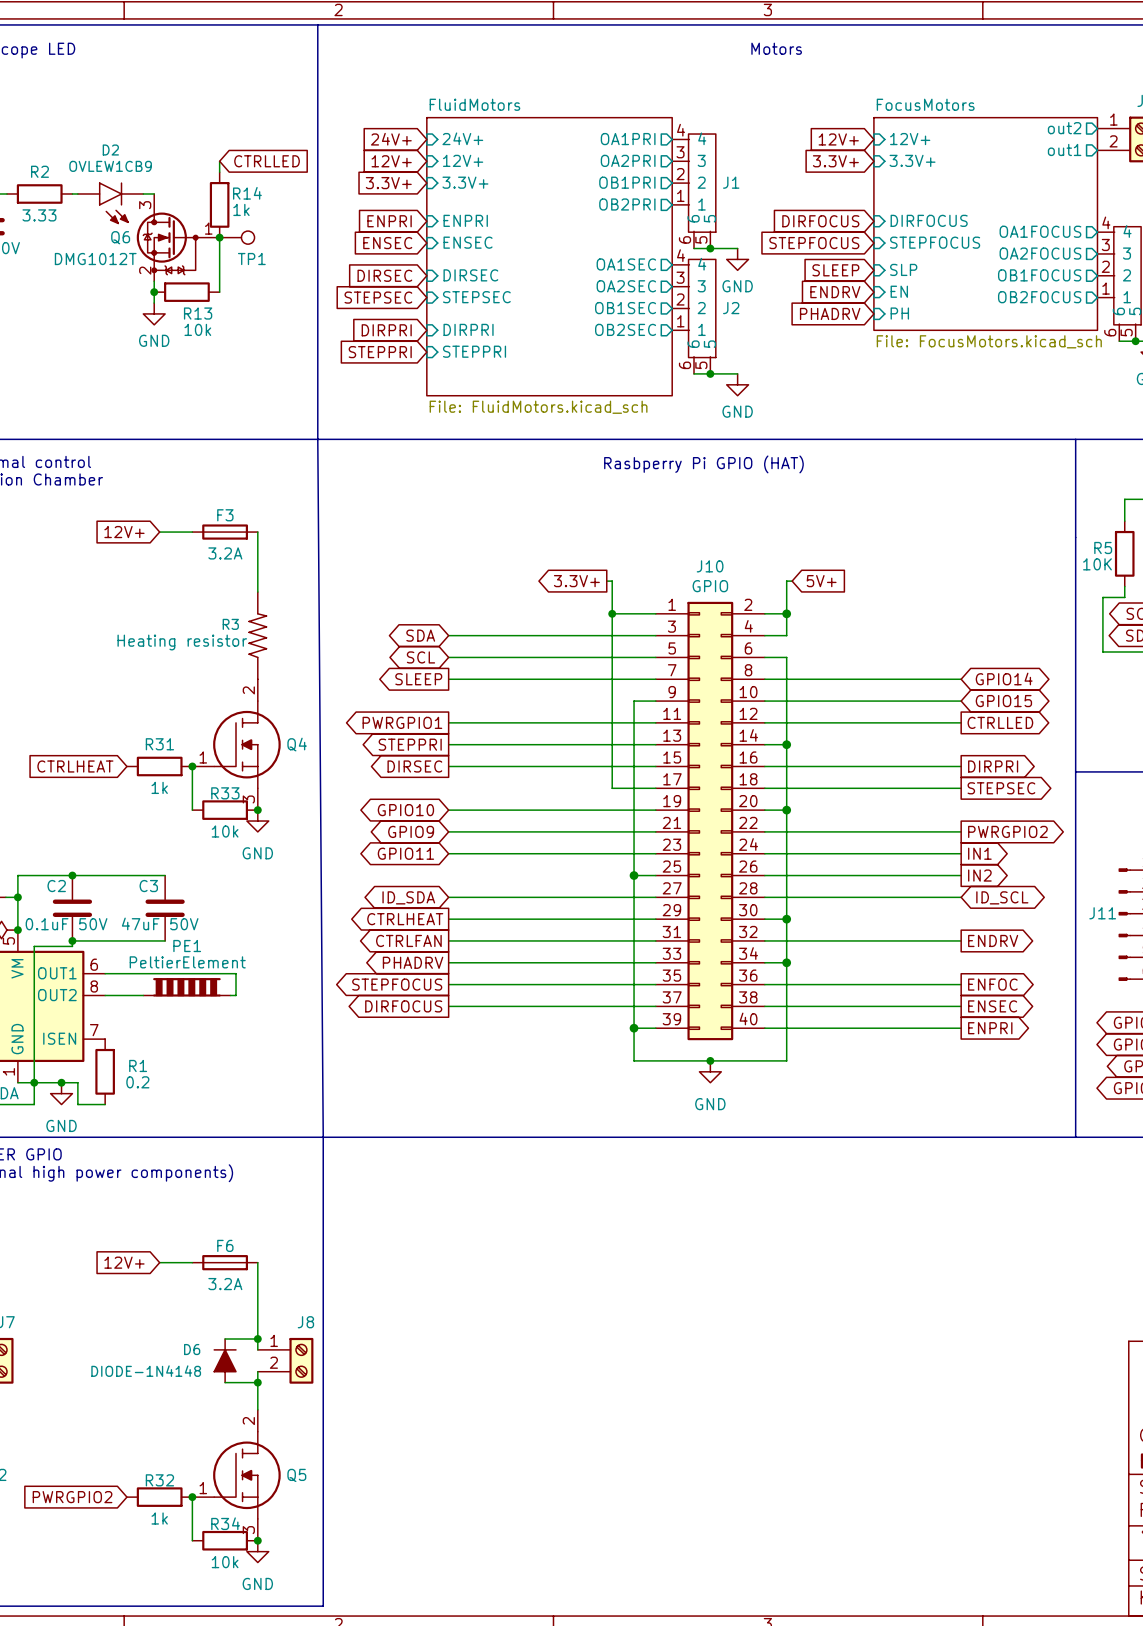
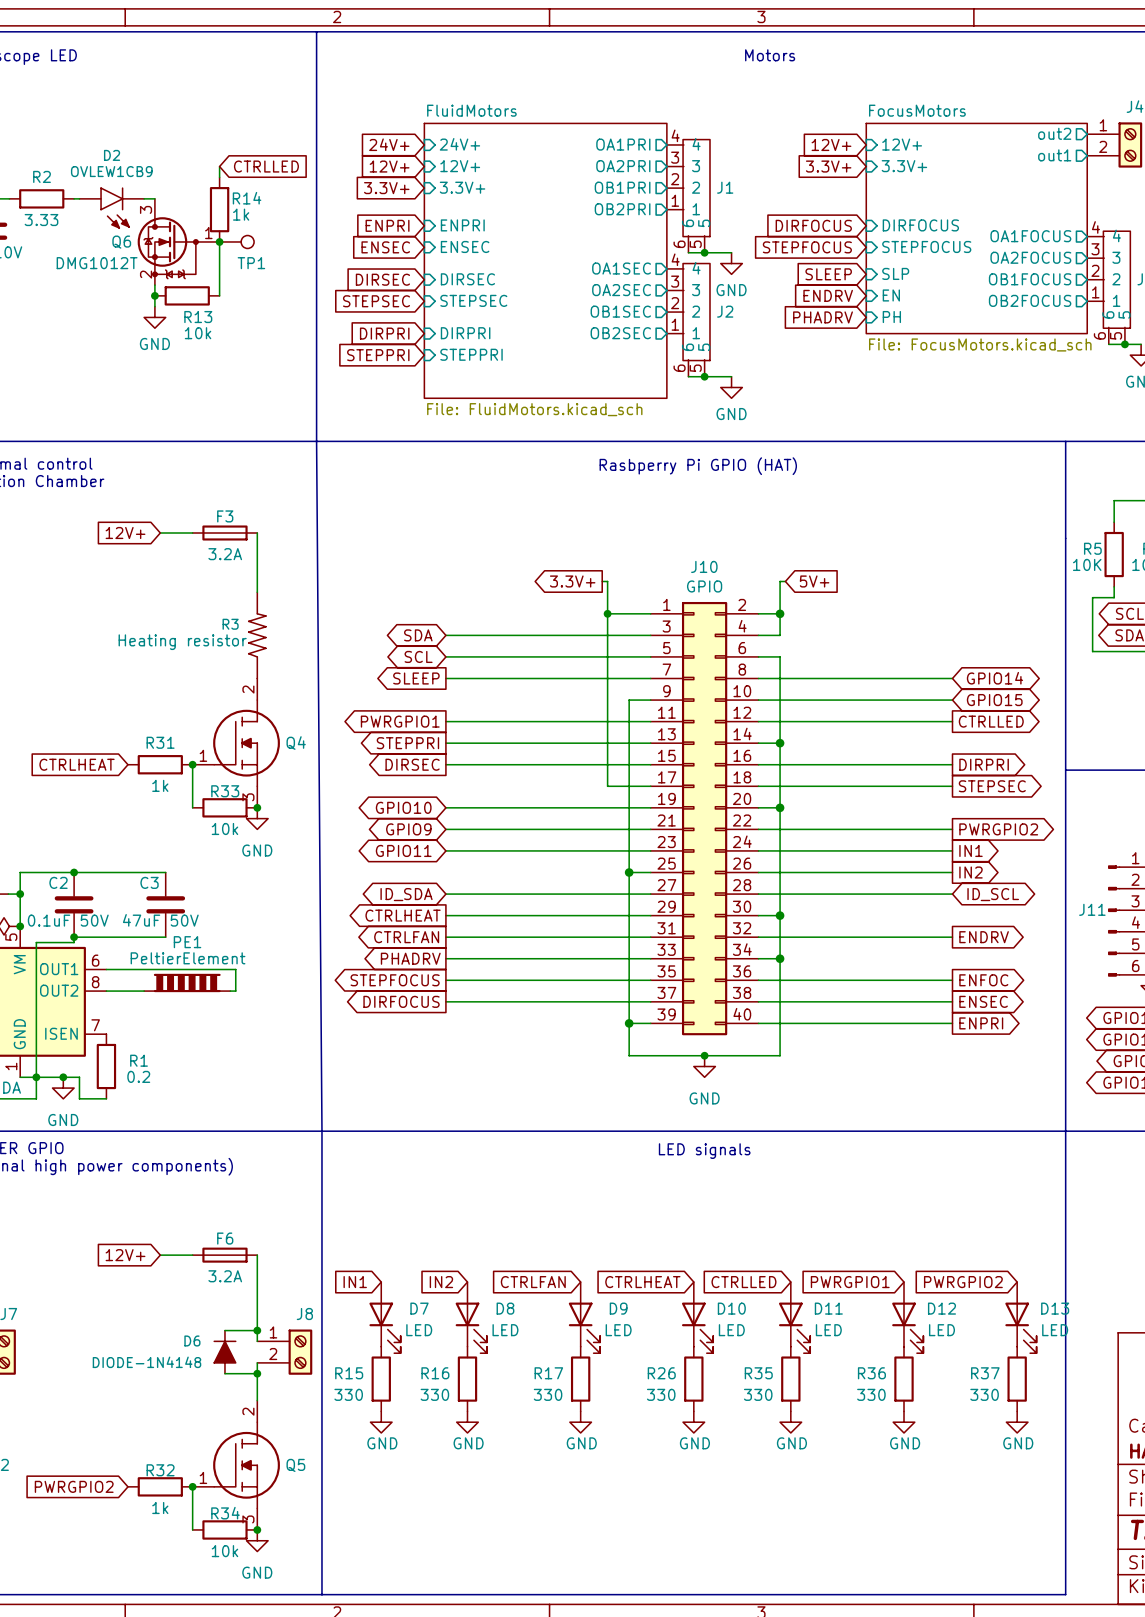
line: none -> (1065, 1131) (1065, 1594) (321, 1594)
text: none -> LED signals (704, 1151)
global label: none -> IN1 (355, 1282)
global label: none -> IN2 (441, 1282)
global label: none -> CTRLFAN (533, 1282)
global label: none -> CTRLHEAT (642, 1282)
global label: none -> CTRLLED (743, 1282)
global label: none -> PWRGPIO1 (850, 1282)
global label: none -> PWRGPIO2 (963, 1282)
D7: none -> LED (385, 1317)
D8: none -> LED (471, 1317)
D9: none -> LED (584, 1317)
D10: none -> LED (697, 1317)
D11: none -> LED (794, 1317)
D12: none -> LED (907, 1317)
D13: none -> LED (1020, 1317)
R15: none -> 330 (381, 1379)
R16: none -> 330 (467, 1379)
R17: none -> 330 (580, 1379)
R26: none -> 330 (693, 1379)
R35: none -> 330 (790, 1379)
R36: none -> 330 (904, 1379)
R37: none -> 330 (1017, 1379)
power symbol: none -> GND (381, 1422)
power symbol: none -> GND (467, 1422)
power symbol: none -> GND (580, 1422)
power symbol: none -> GND (693, 1422)
power symbol: none -> GND (790, 1422)
power symbol: none -> GND (904, 1422)
power symbol: none -> GND (1017, 1422)

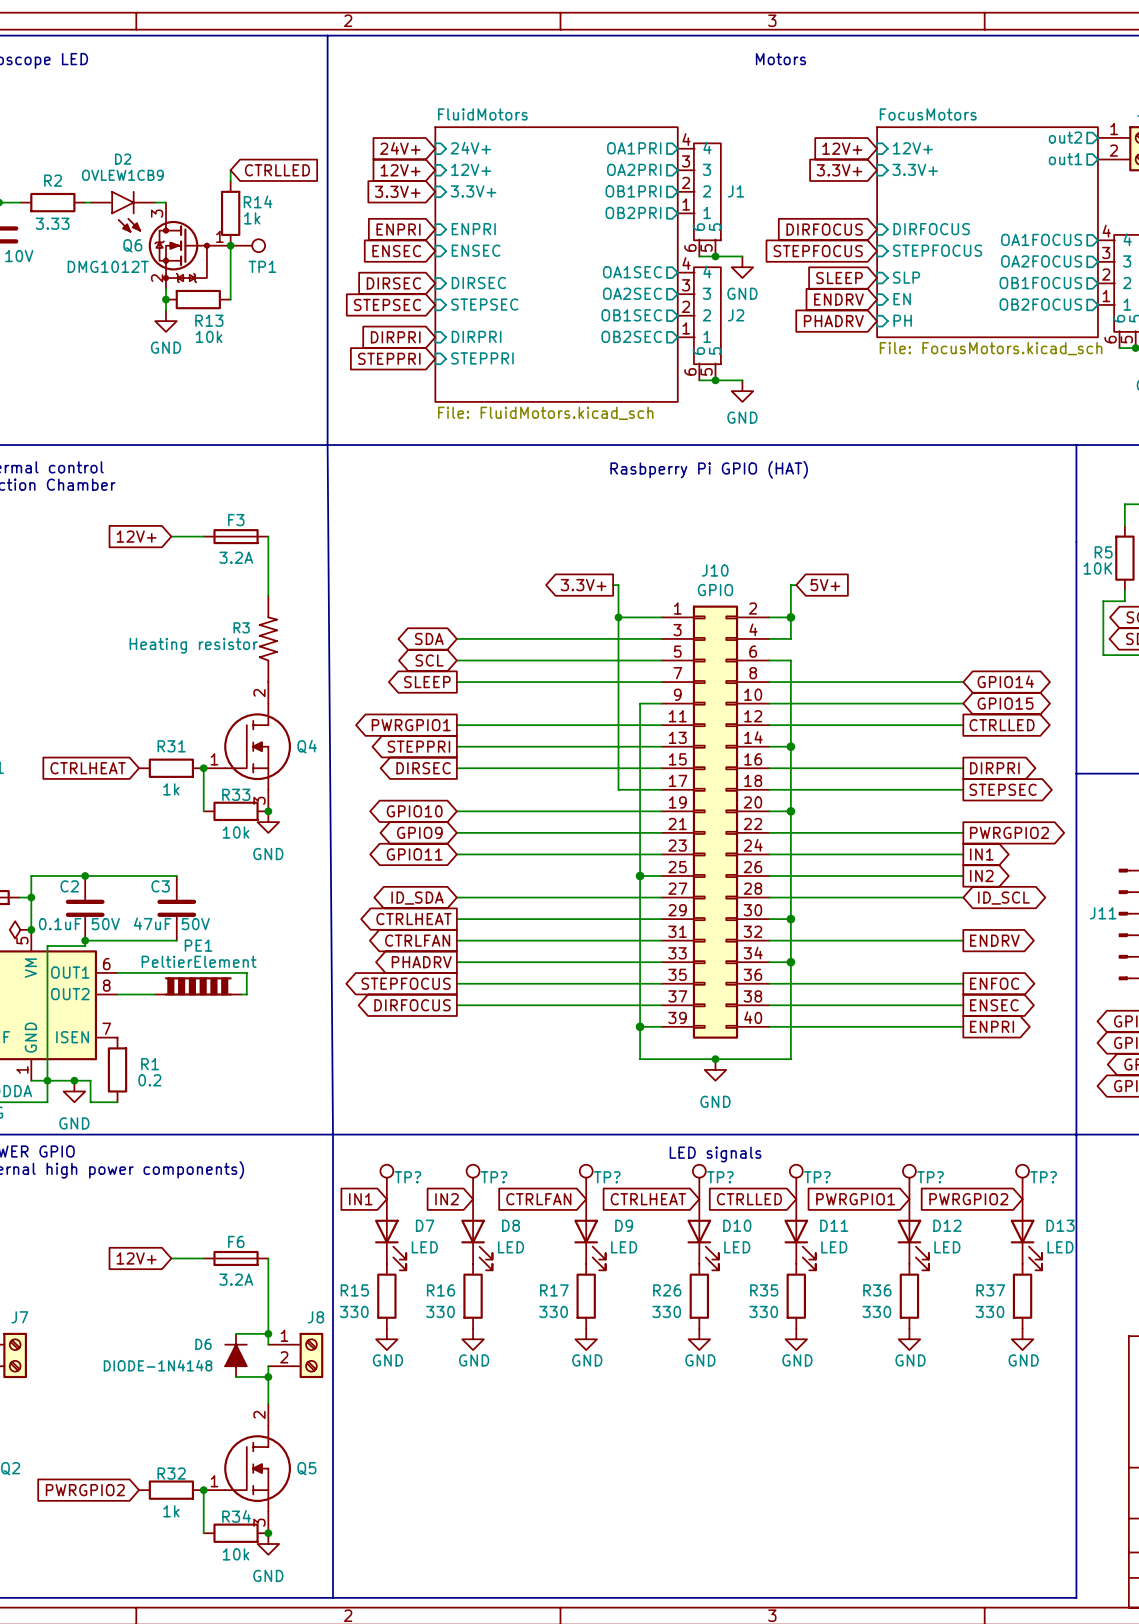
TP?: none -> (386, 1181)
TP?: none -> (473, 1181)
TP?: none -> (586, 1181)
TP?: none -> (699, 1181)
TP?: none -> (796, 1181)
TP?: none -> (909, 1181)
TP?: none -> (1022, 1181)
global label position: IN1 (355, 1282) -> IN1 (360, 1199)
global label position: IN2 (441, 1282) -> IN2 (447, 1199)
global label position: CTRLFAN (533, 1282) -> CTRLFAN (538, 1199)
global label position: CTRLHEAT (642, 1282) -> CTRLHEAT (648, 1199)
global label position: CTRLLED (743, 1282) -> CTRLLED (749, 1199)
global label position: PWRGPIO1 (850, 1282) -> PWRGPIO1 (855, 1199)
global label position: PWRGPIO2 (963, 1282) -> PWRGPIO2 (968, 1199)
D7 position: (385, 1317) -> (390, 1234)
D8 position: (471, 1317) -> (476, 1234)
D9 position: (584, 1317) -> (589, 1234)
D10 position: (697, 1317) -> (703, 1234)
D11 position: (794, 1317) -> (800, 1234)
D12 position: (907, 1317) -> (913, 1234)
D13 position: (1020, 1317) -> (1026, 1234)
power symbol: none -> GND (386, 1339)
power symbol: none -> GND (473, 1339)
power symbol: none -> GND (586, 1339)
power symbol: none -> GND (699, 1339)
power symbol: none -> GND (796, 1339)
power symbol: none -> GND (909, 1339)
power symbol: none -> GND (1022, 1339)
R15 position: (381, 1379) -> (386, 1296)
R16 position: (467, 1379) -> (473, 1296)
R17 position: (580, 1379) -> (586, 1296)
R26 position: (693, 1379) -> (699, 1296)
R35 position: (790, 1379) -> (796, 1296)
R36 position: (904, 1379) -> (909, 1296)
R37 position: (1017, 1379) -> (1022, 1296)
power symbol: GND (381, 1422) -> none
power symbol: GND (467, 1422) -> none
power symbol: GND (580, 1422) -> none
power symbol: GND (693, 1422) -> none
power symbol: GND (790, 1422) -> none
power symbol: GND (904, 1422) -> none
power symbol: GND (1017, 1422) -> none

